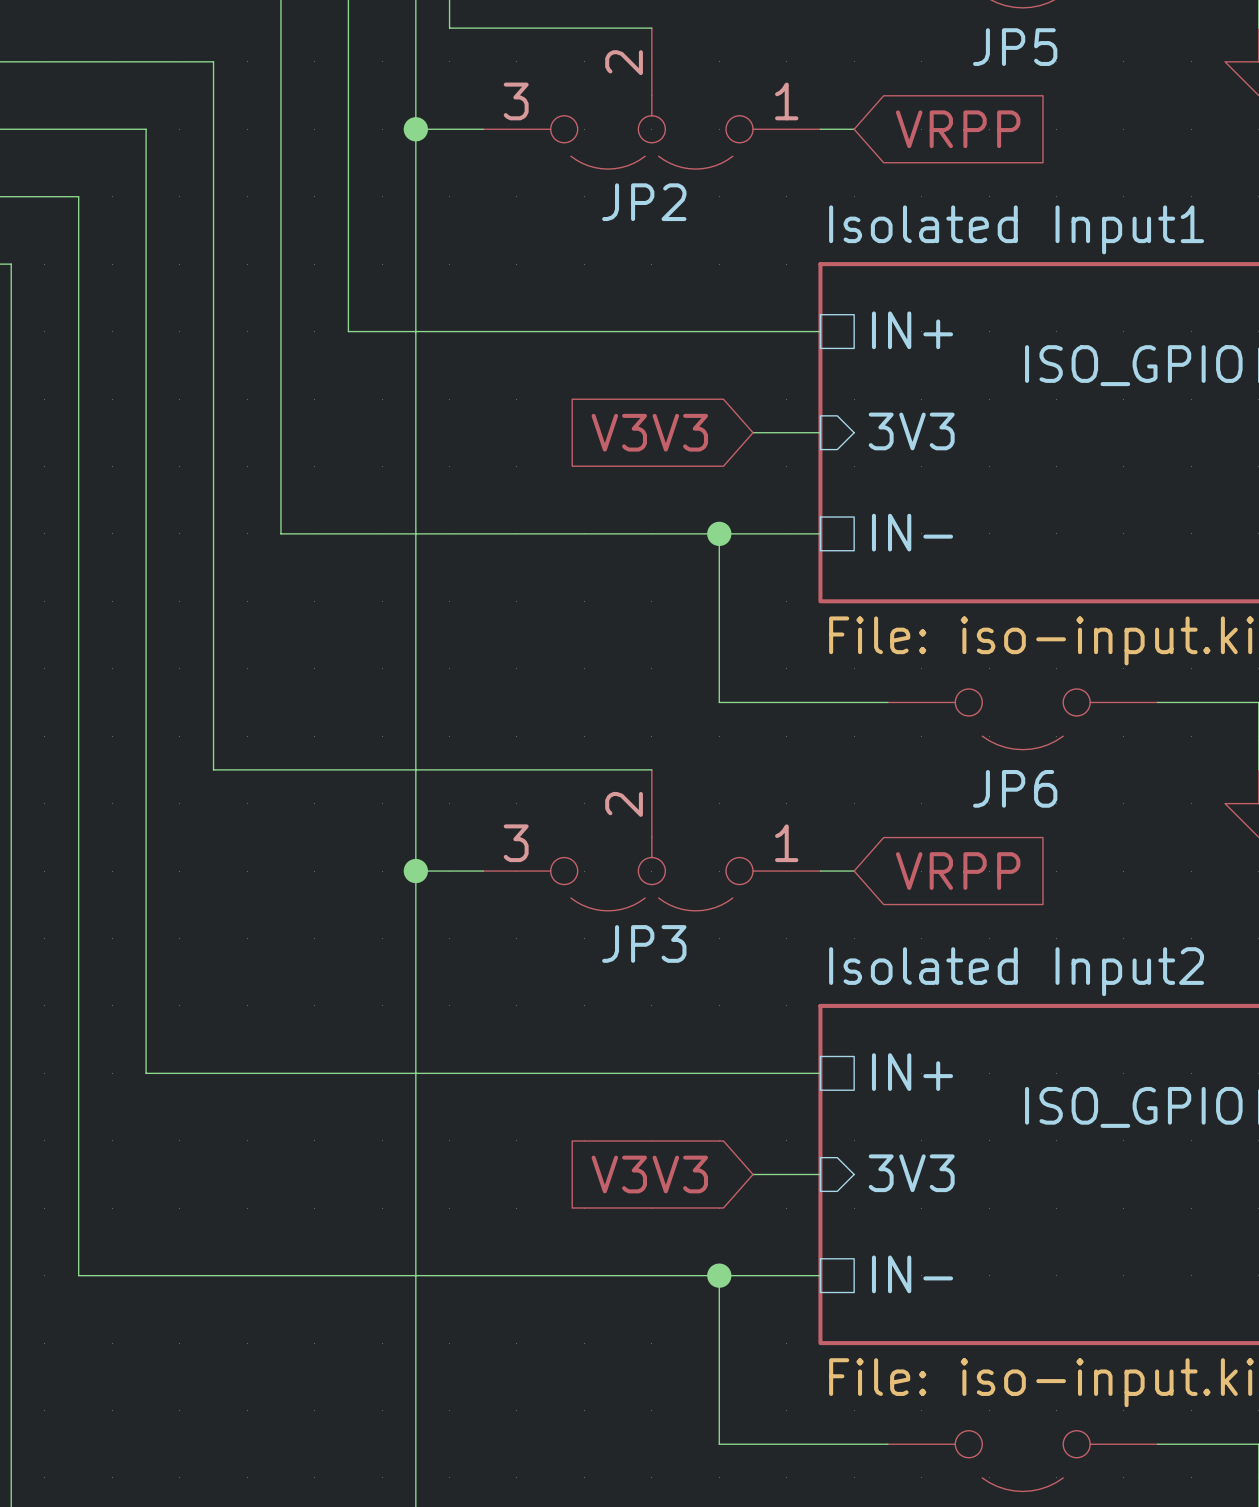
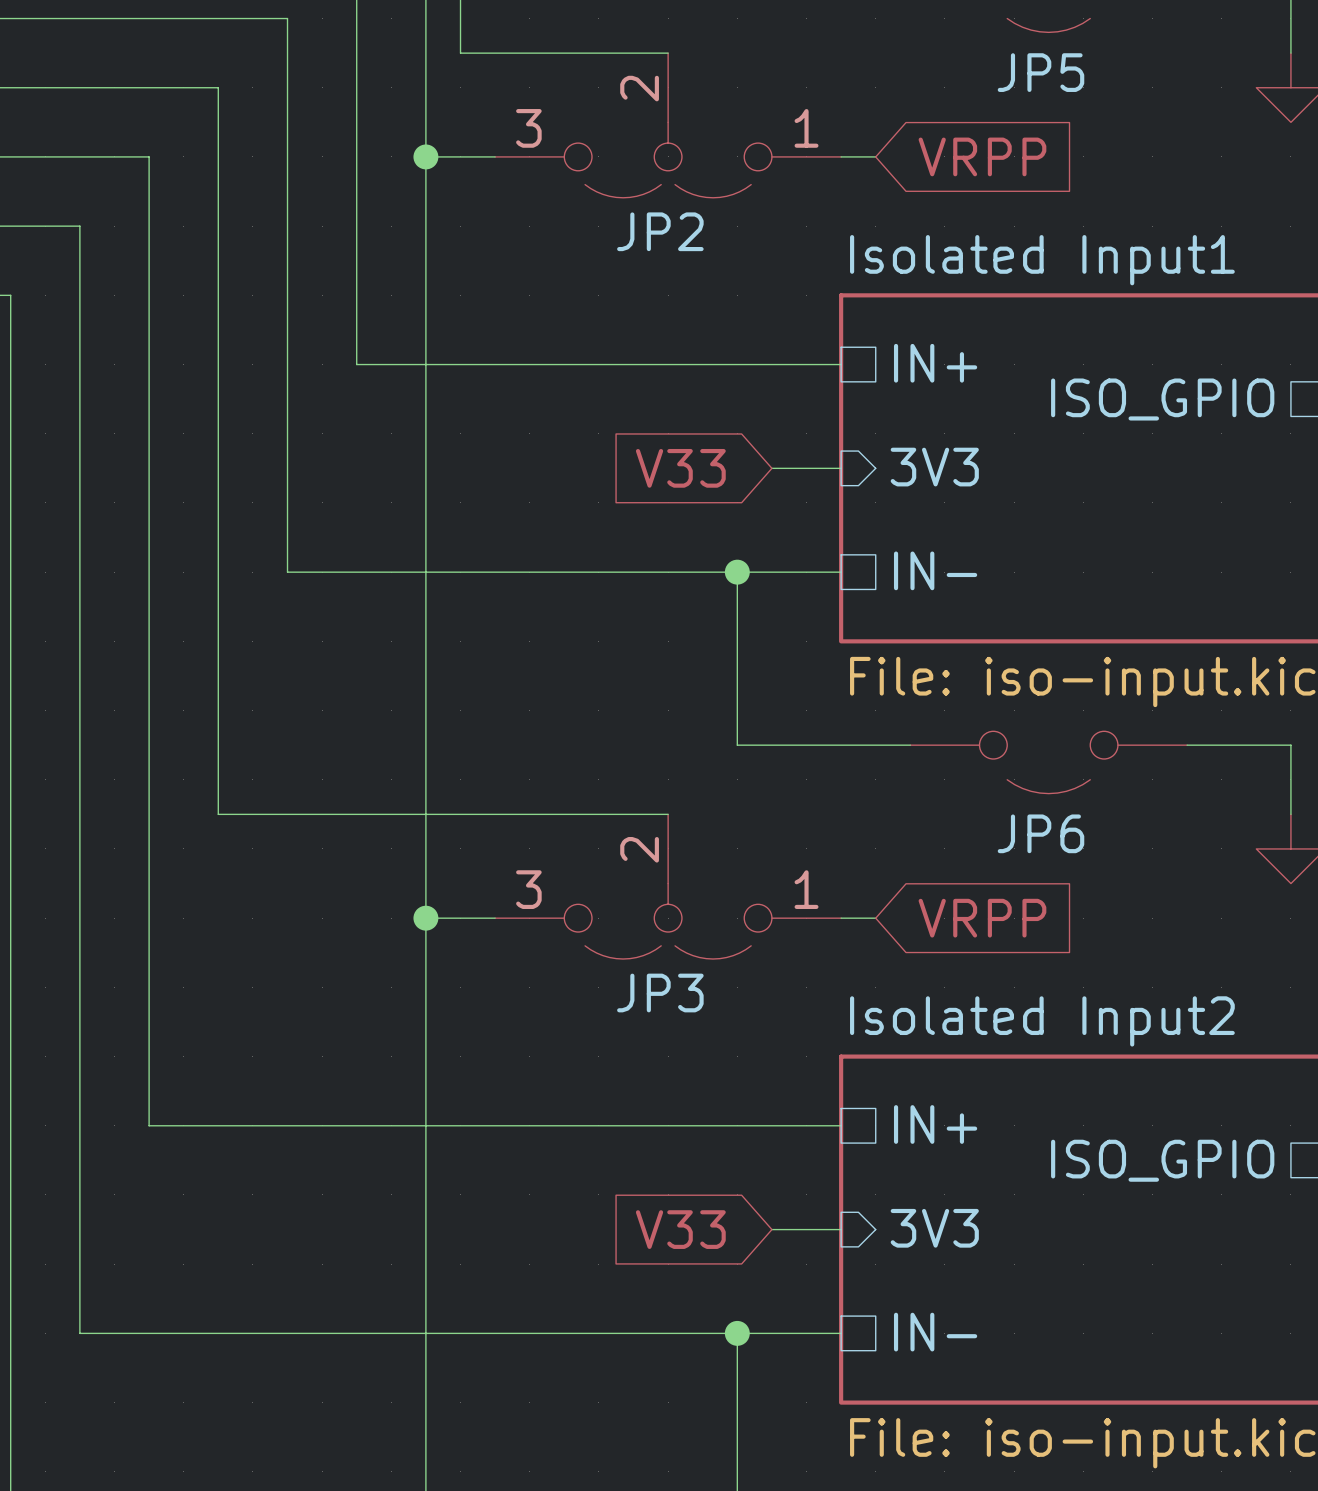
global label: V3V3 (649, 432) -> V33 (680, 468)
global label: V3V3 (649, 1174) -> V33 (680, 1229)

